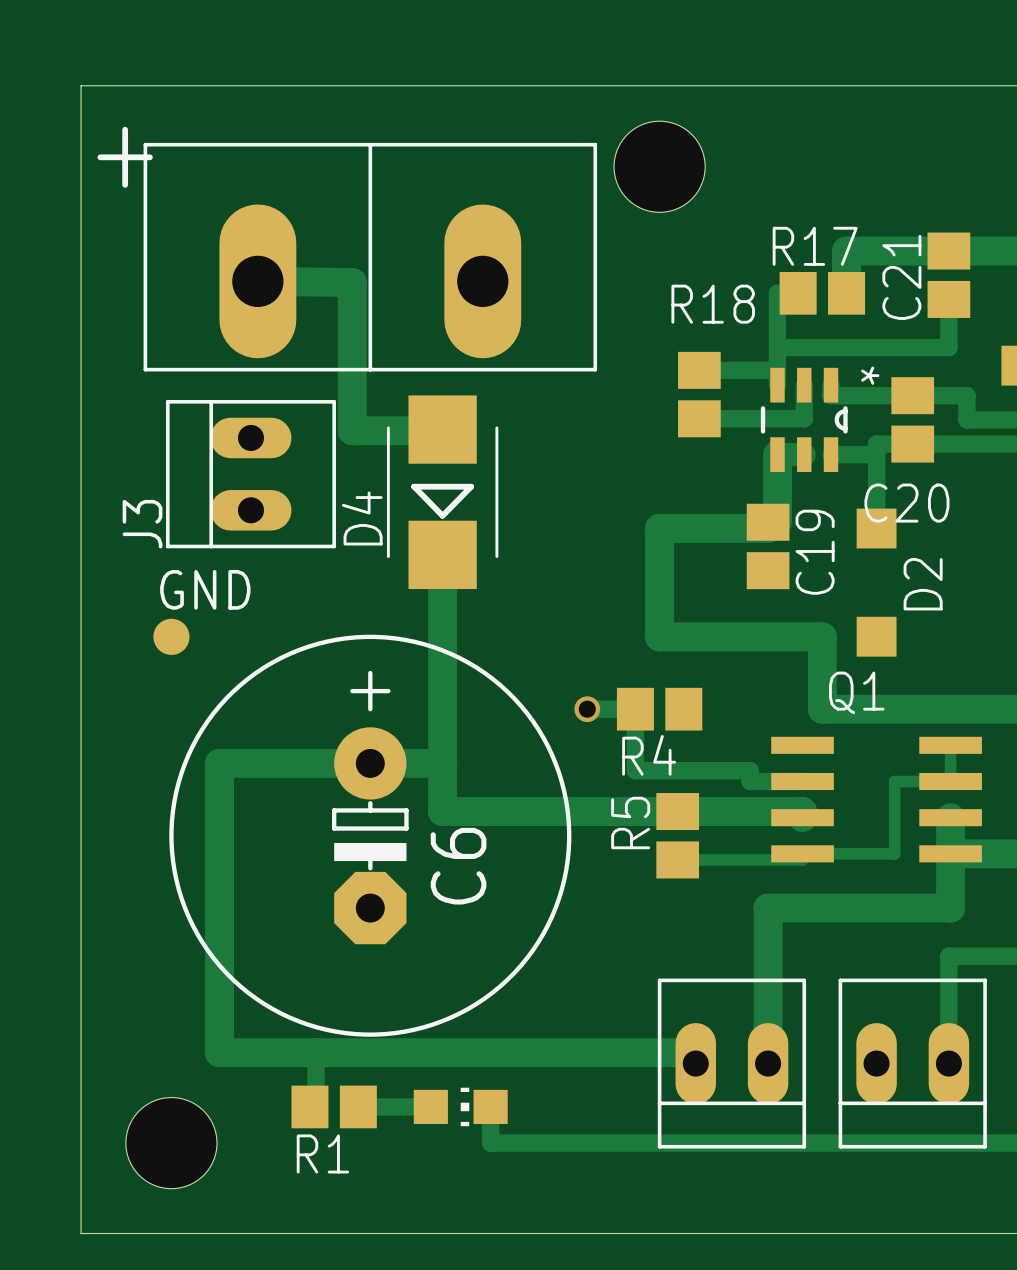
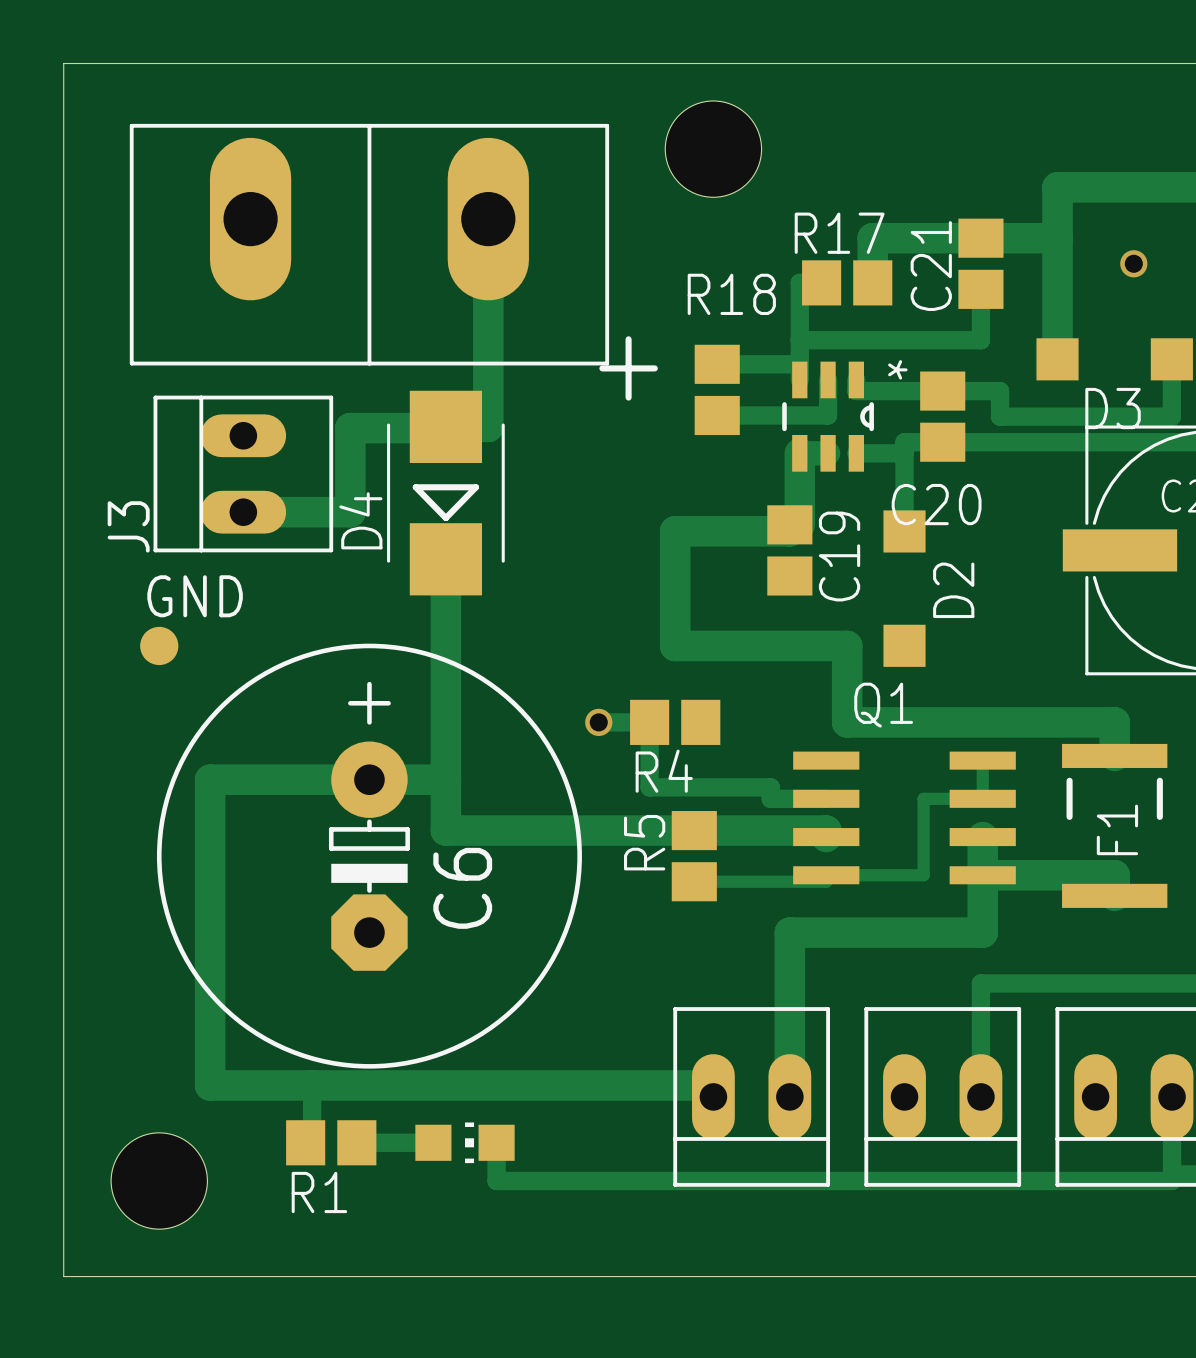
part footprint: [143, 142, 598, 372] -> [129, 123, 610, 366]
hole position: (659, 166) -> (713, 149)
track: none -> (488, 219) (488, 426) (445, 426)
track: (257, 281) (352, 282) (352, 430) -> (243, 512) (350, 512) (350, 428)

